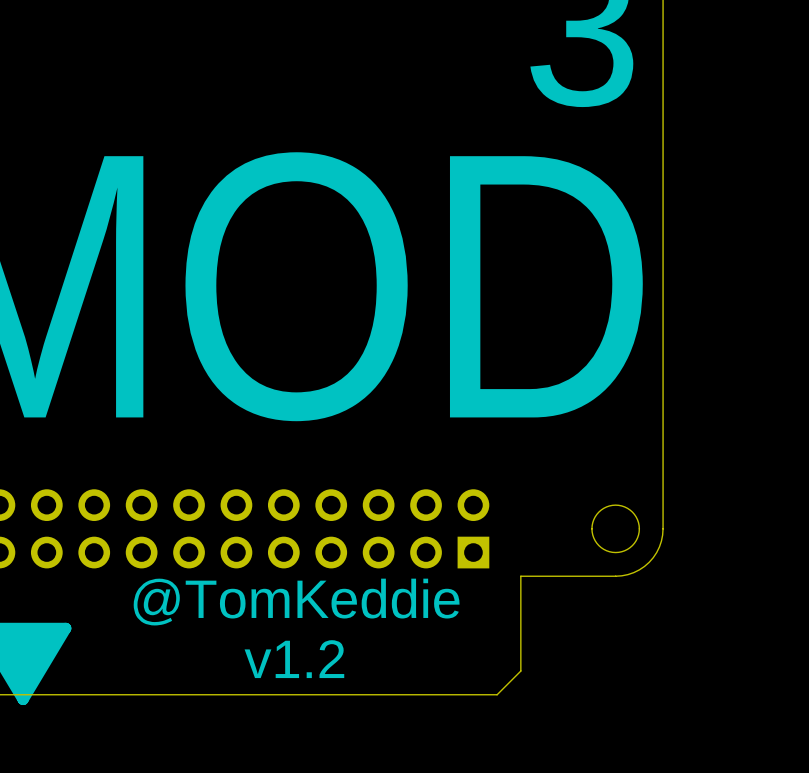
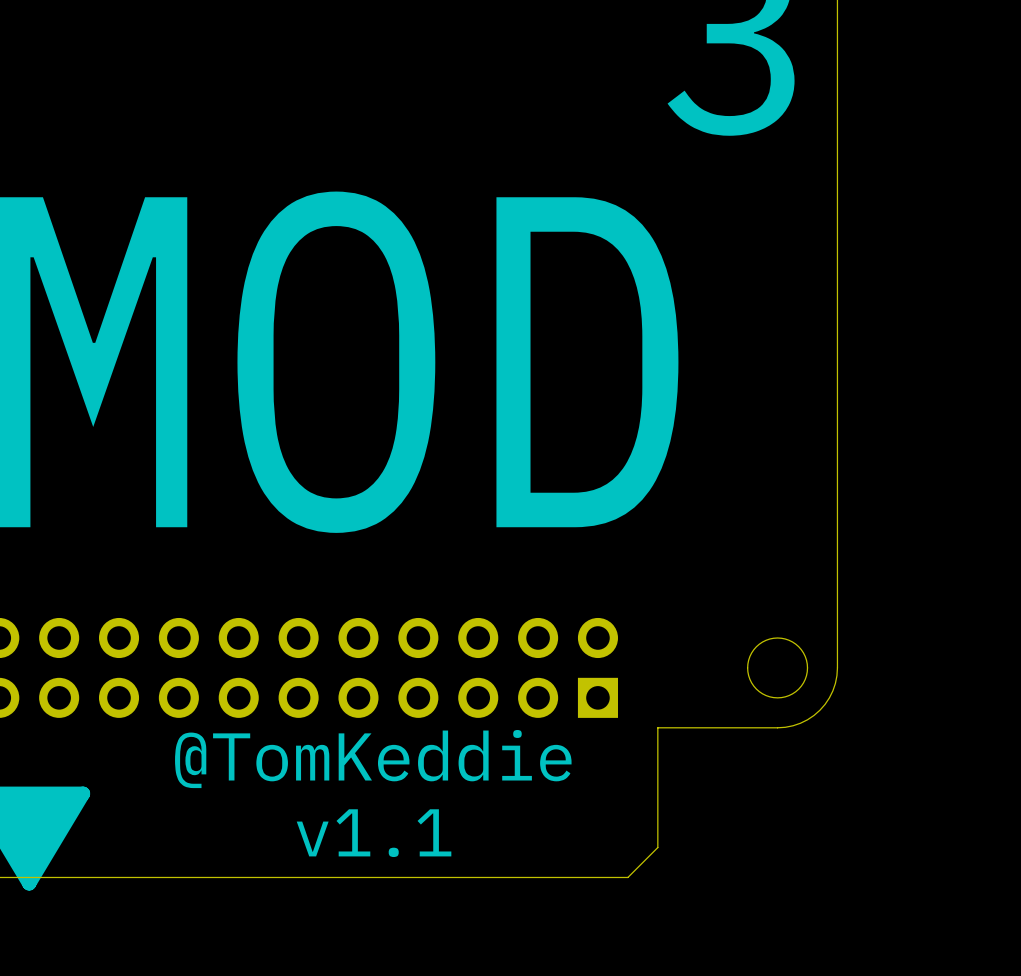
text: v1.2 (294, 659) -> v1.1 (374, 833)

